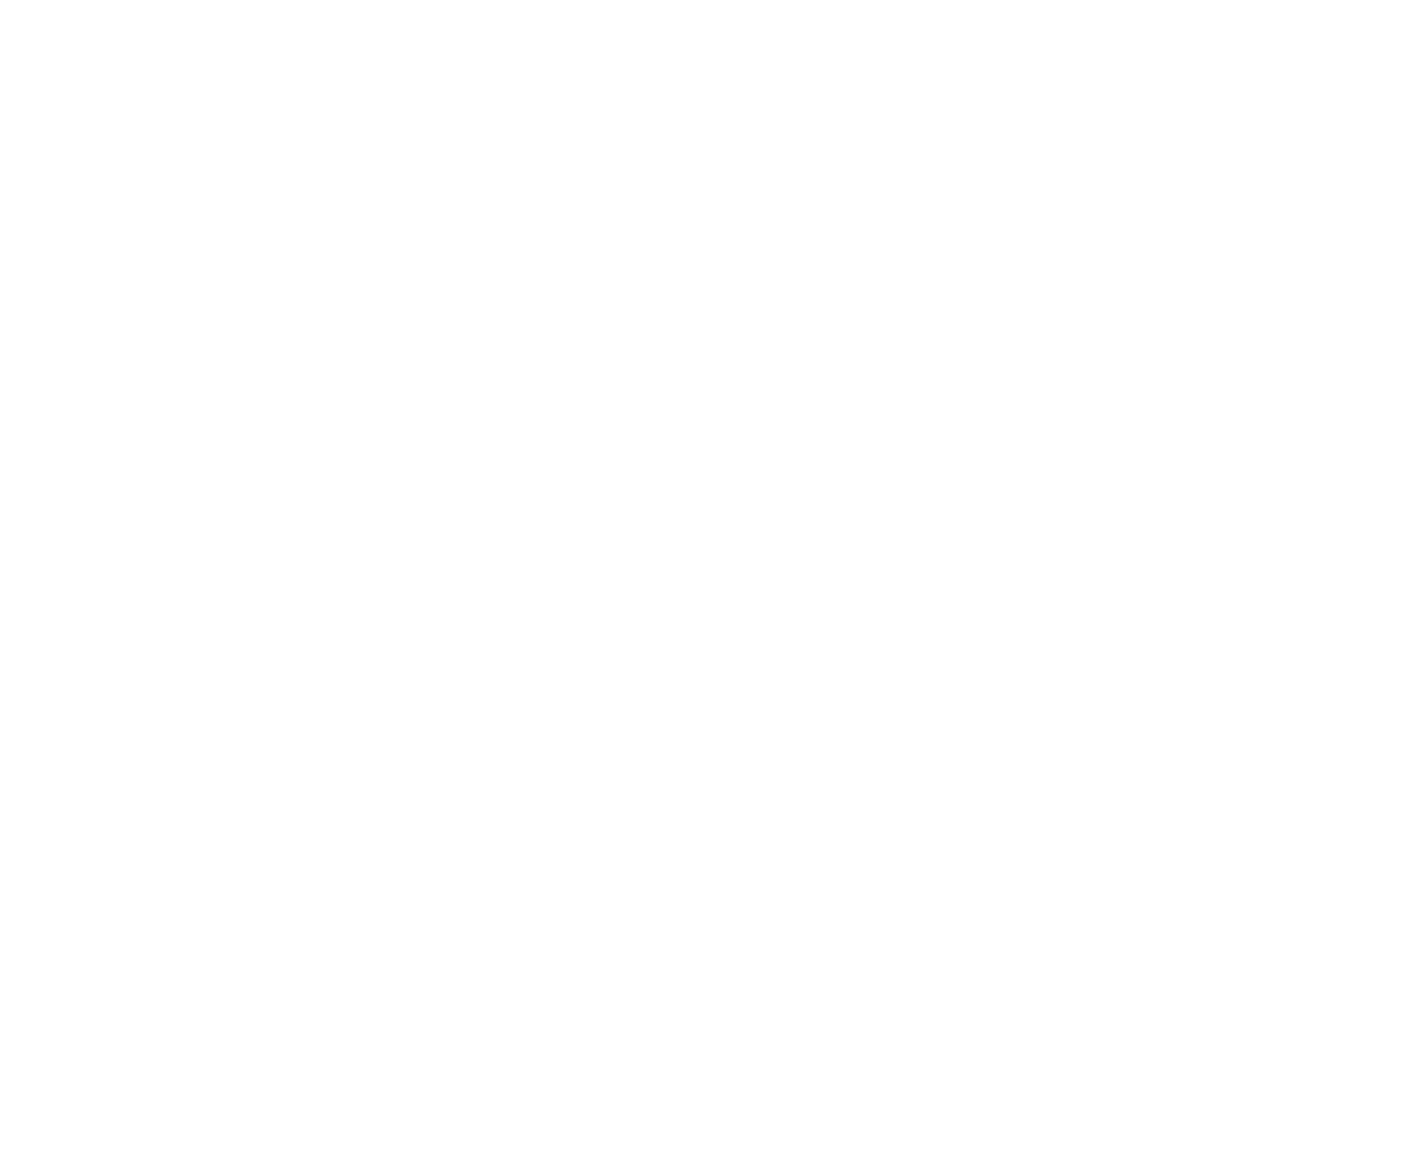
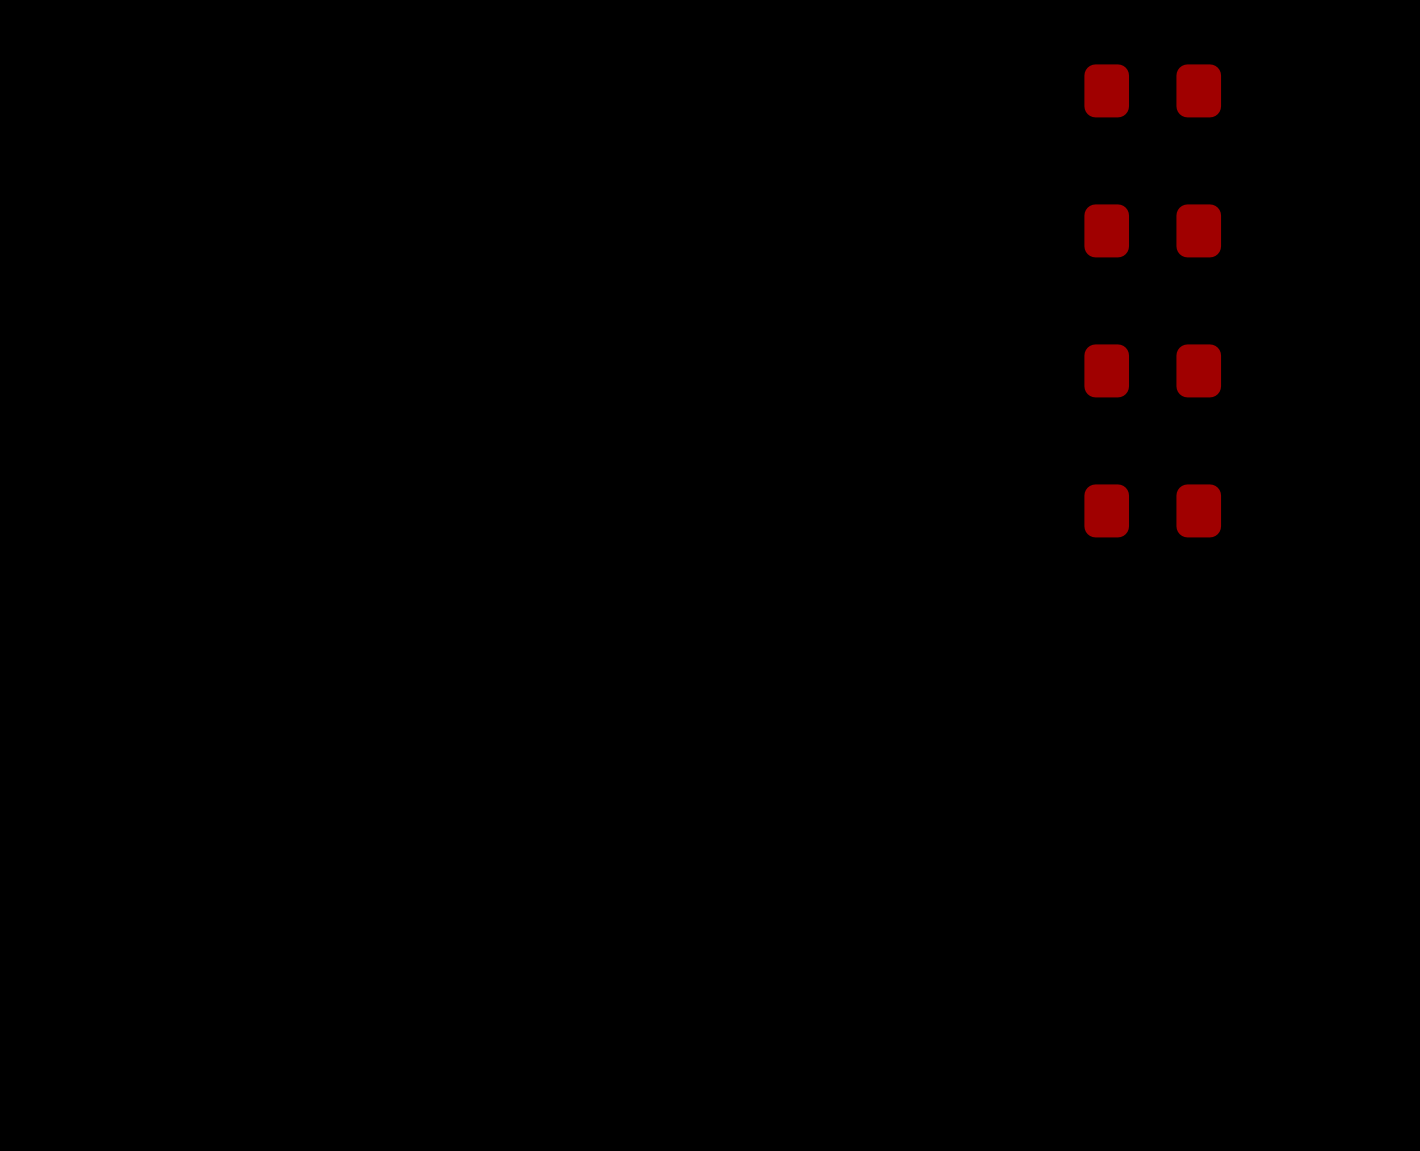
part: none -> (1152, 90)
part: none -> (1152, 230)
part: none -> (1152, 370)
part: none -> (1152, 510)

